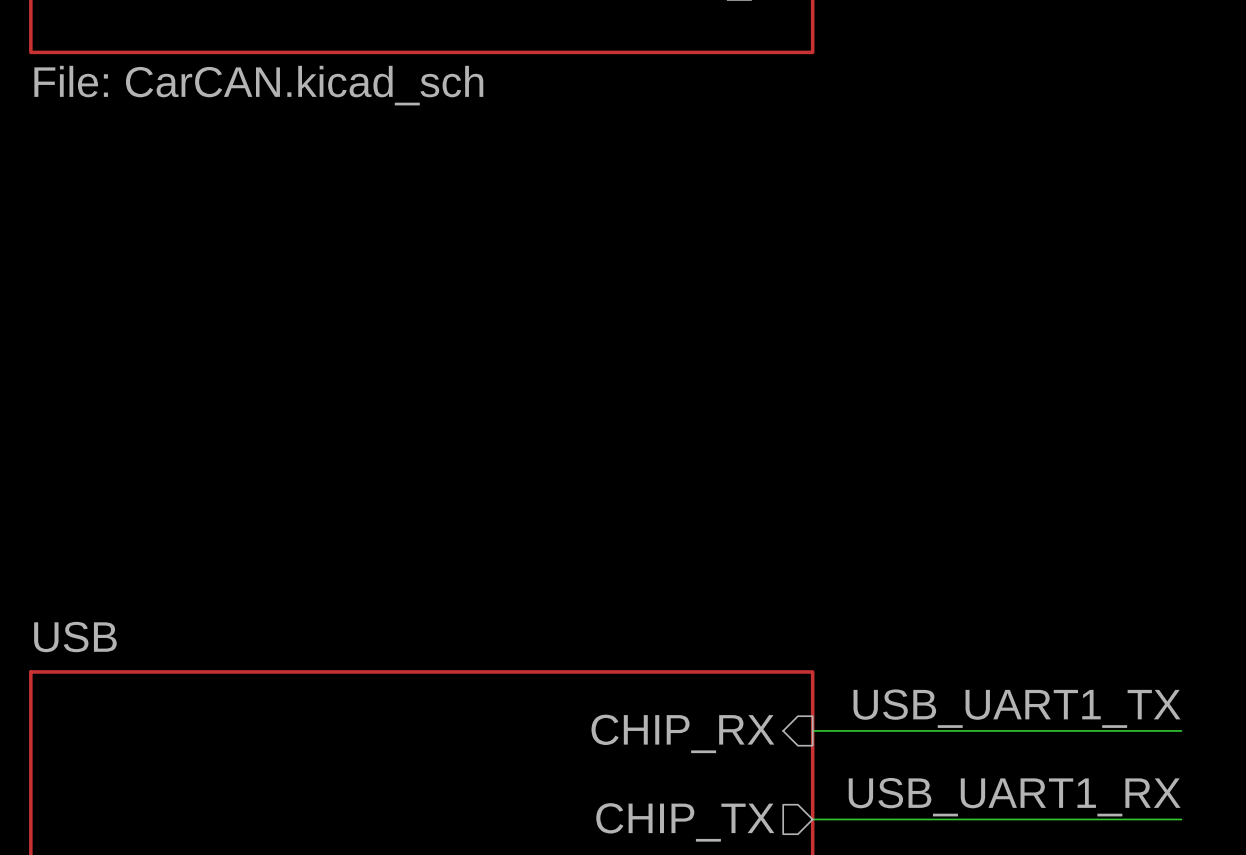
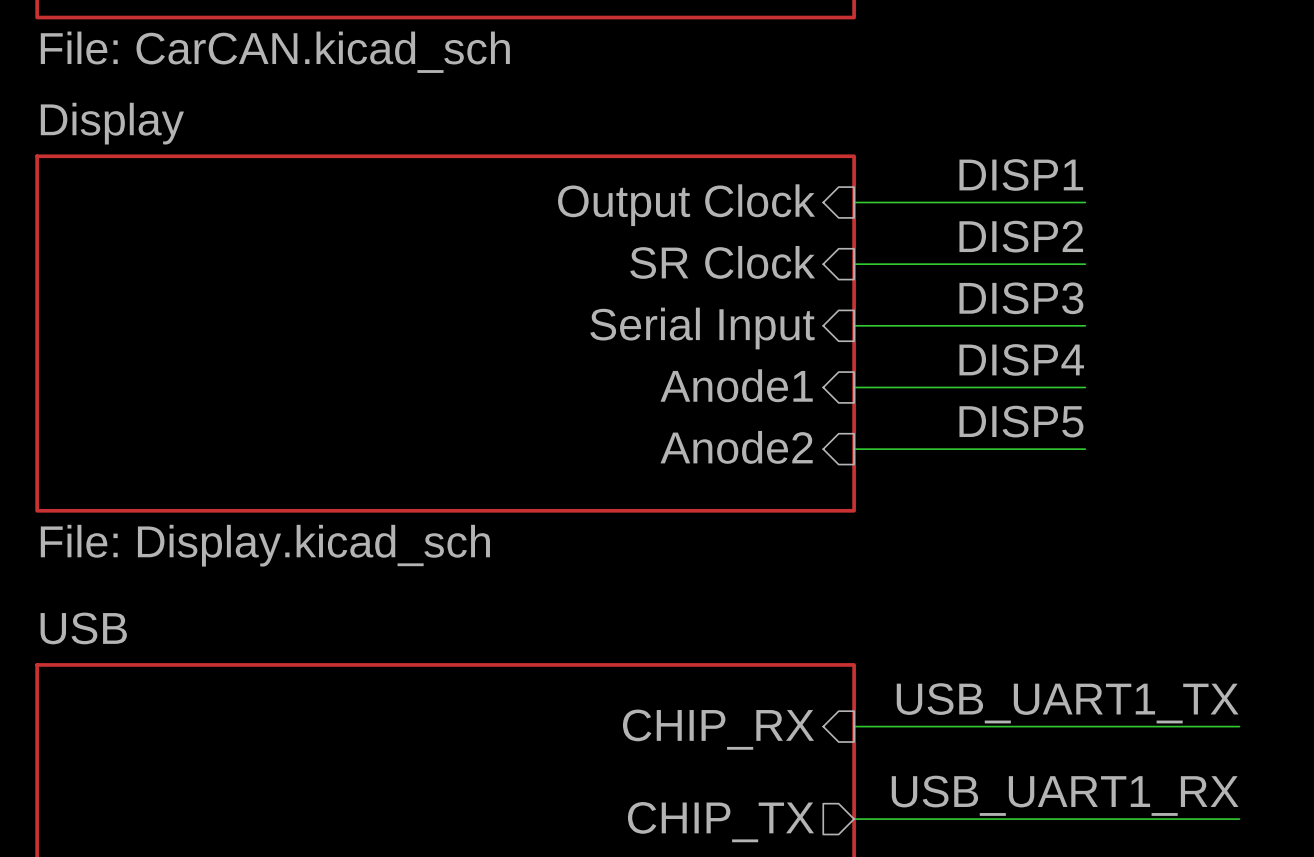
label: none -> DISP1 (1021, 174)
wire: none -> (854, 202) (1085, 202)
sheet pin: none -> Output Clock (686, 205)
label: none -> DISP2 (1021, 236)
sheet pin: none -> SR Clock (722, 262)
wire: none -> (854, 264) (1085, 264)
label: none -> DISP3 (1021, 298)
wire: none -> (854, 325) (1085, 325)
sheet pin: none -> Serial Input (702, 328)
sheet Display: none -> File: Display.kicad_sch (445, 333)
label: none -> DISP4 (1021, 359)
sheet pin: none -> Anode1 (736, 385)
wire: none -> (854, 387) (1085, 387)
label: none -> DISP5 (1021, 421)
sheet pin: none -> Anode2 (736, 447)
wire: none -> (854, 449) (1085, 449)

